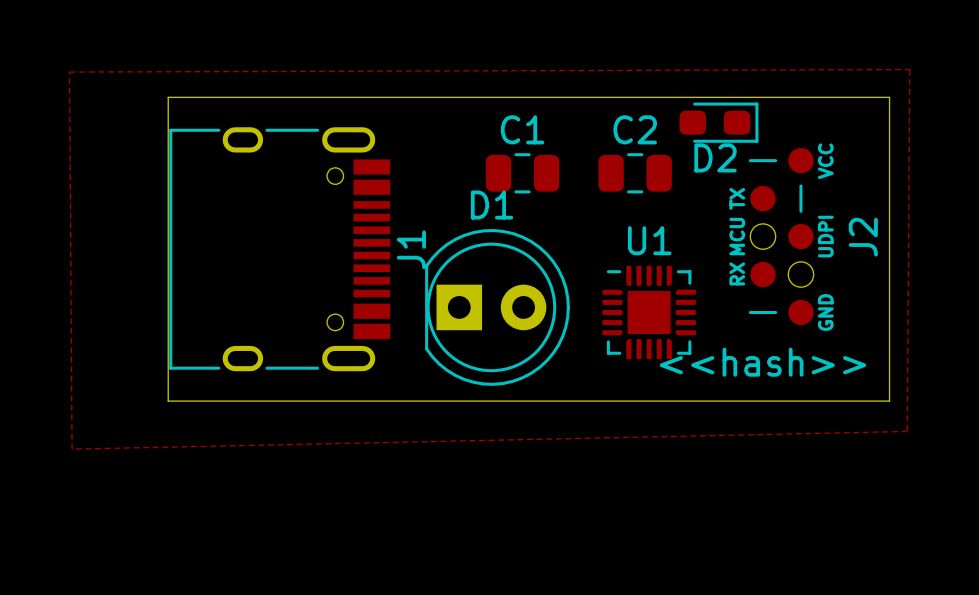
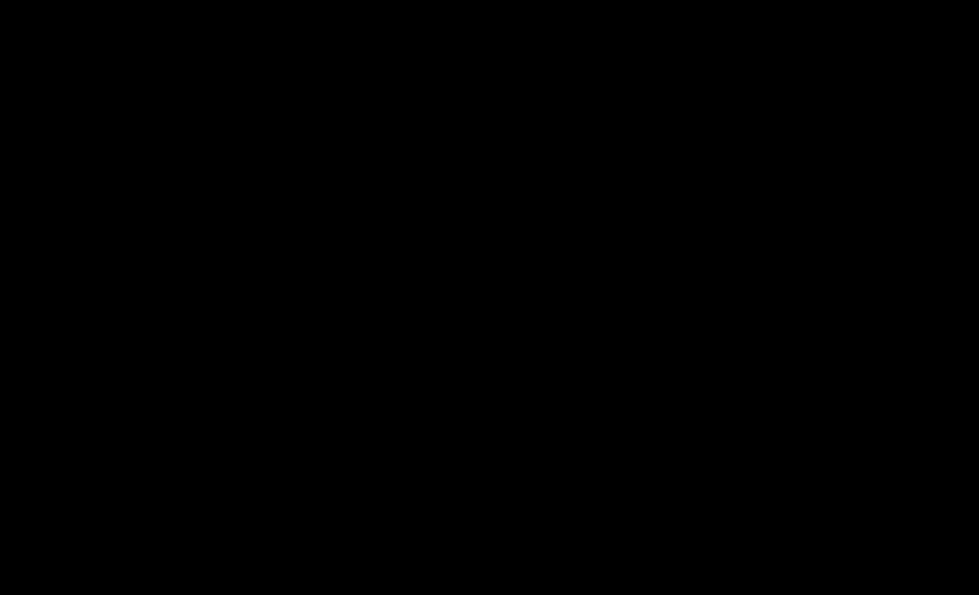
zone outline: (909, 69) (69, 72) (72, 449) (907, 431) (909, 69) -> none
board edge: (168, 97) (168, 401) (889, 401) (889, 97) (168, 97) -> none
D2: (718, 122) -> none
C1: (522, 173) -> none
C2: (635, 173) -> none
J2: (781, 236) -> none
J1: (279, 249) -> none
D1: (497, 307) -> none
U1: (649, 312) -> none
text: <<hash>> (763, 362) -> none

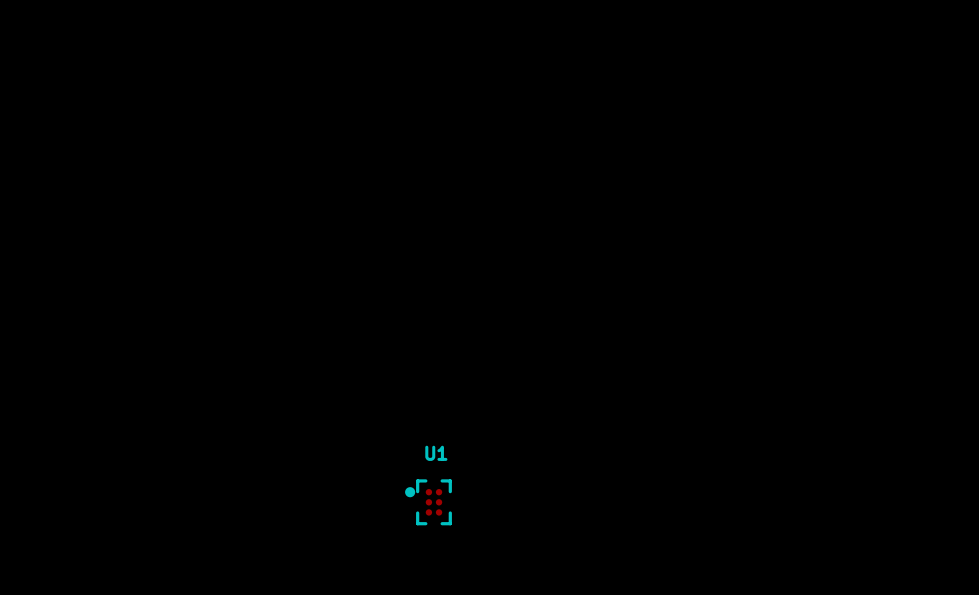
U1: none -> (428, 502)

